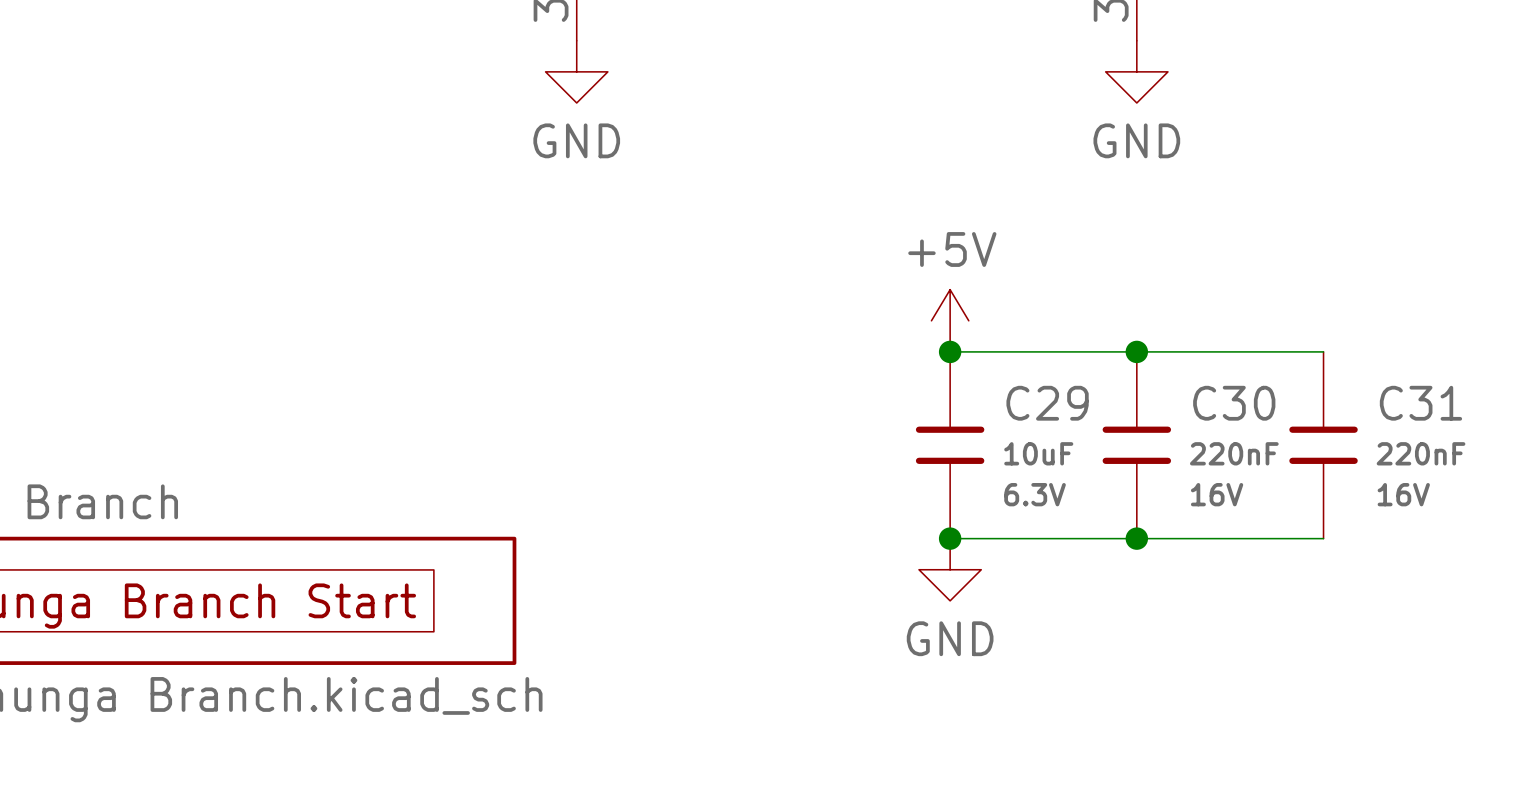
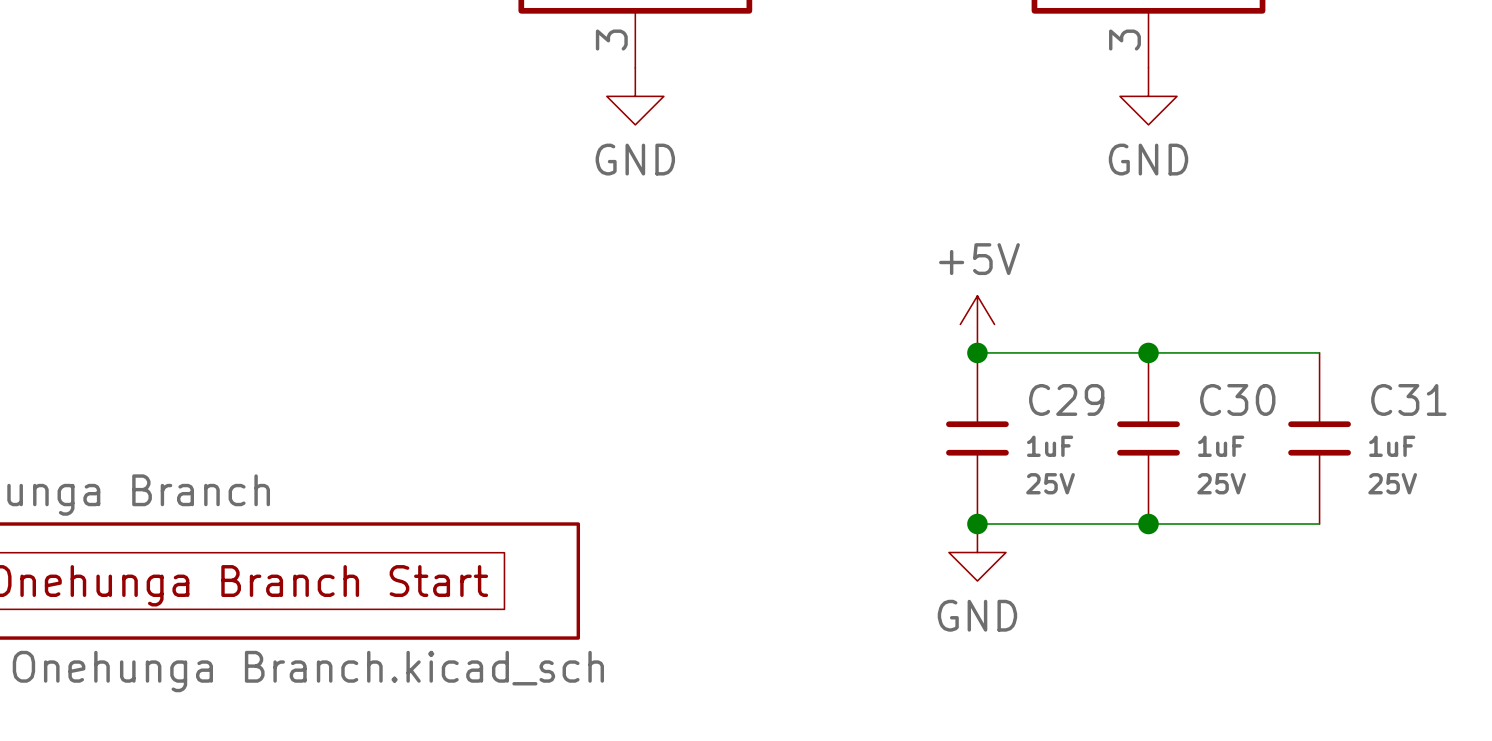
C29 value: 10uF (1038, 453) -> 1uF (1050, 446)
C30 value: 220nF (1234, 453) -> 1uF (1221, 446)
C31 value: 220nF (1421, 453) -> 1uF (1392, 446)
C29 text: 6.3V (1035, 494) -> 25V (1050, 483)
C30 text: 16V (1217, 494) -> 25V (1221, 483)
C31 text: 16V (1403, 494) -> 25V (1392, 483)

